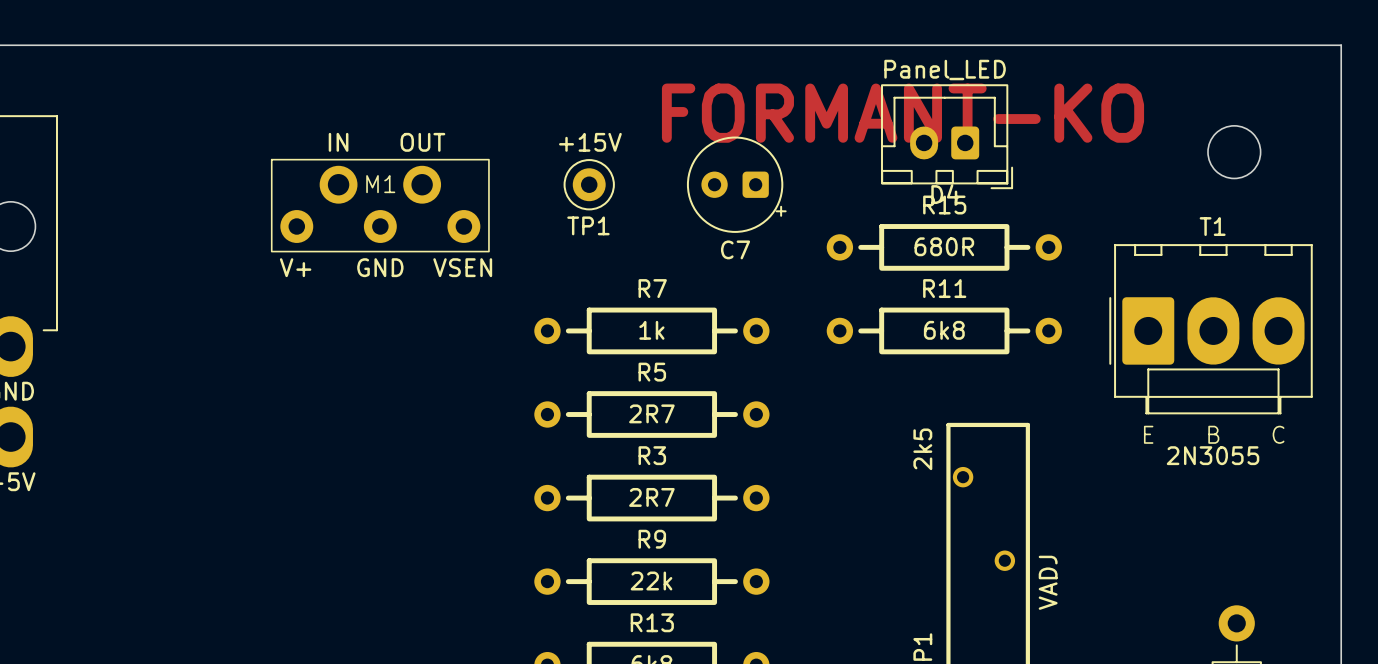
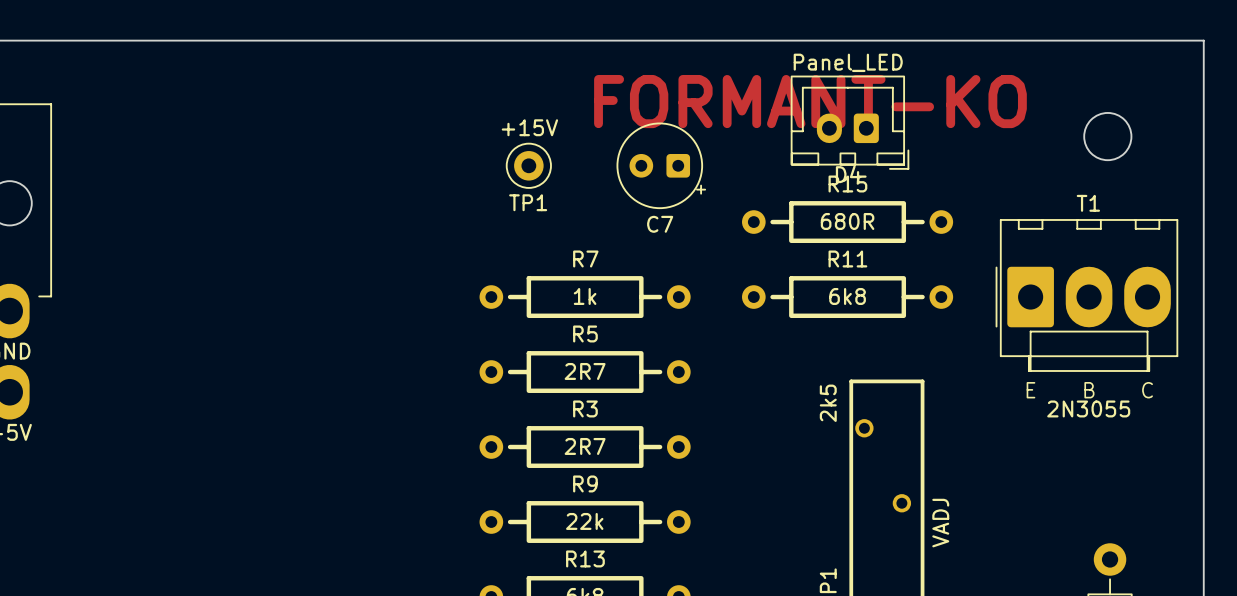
M1: (380, 205) -> none

